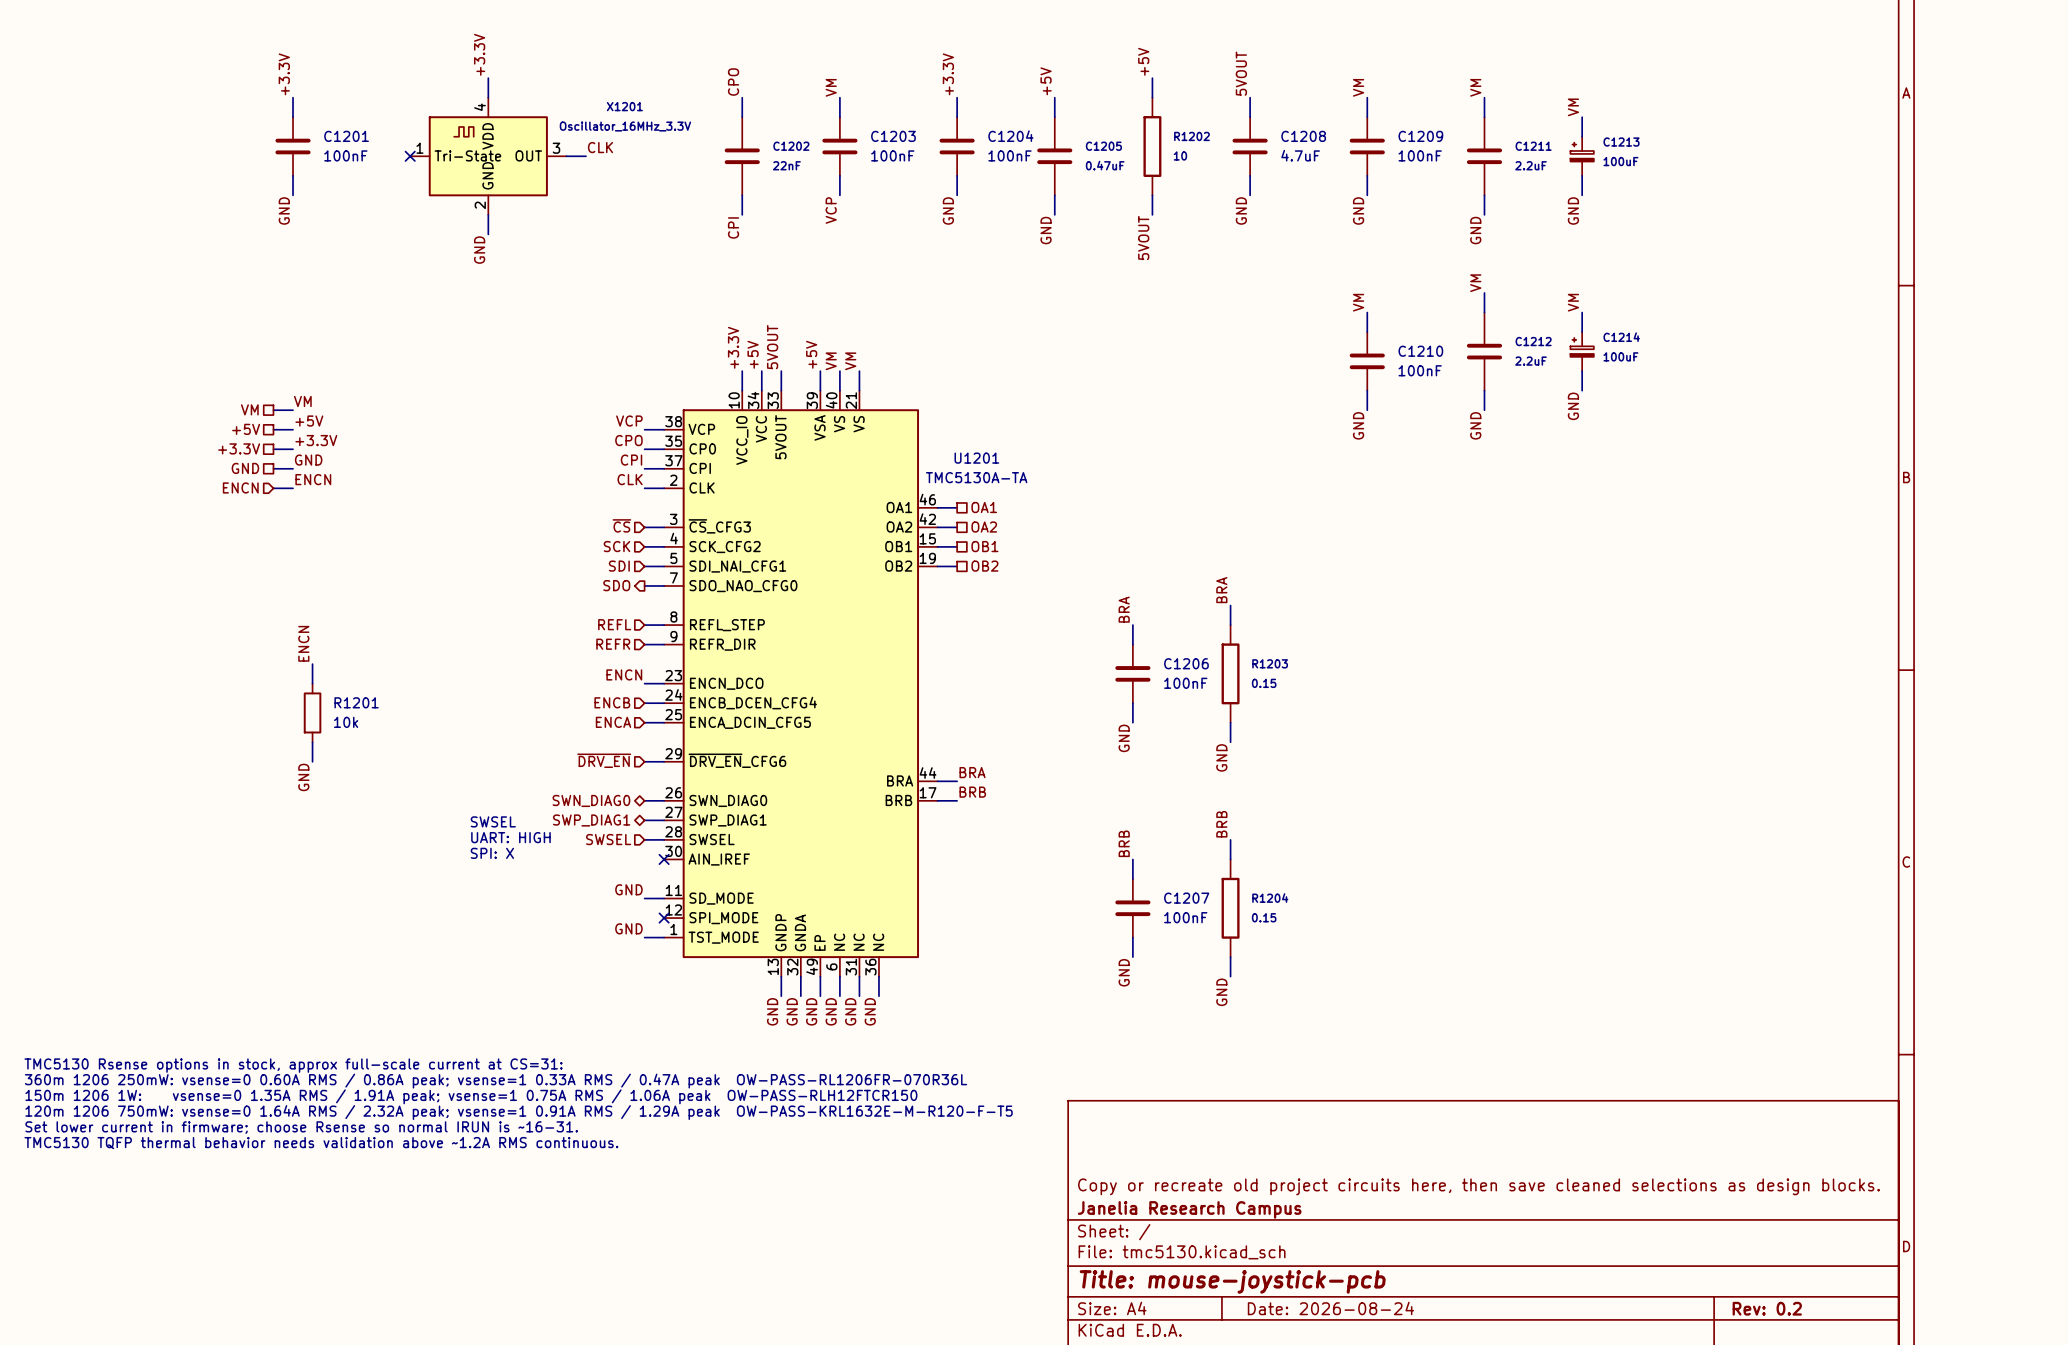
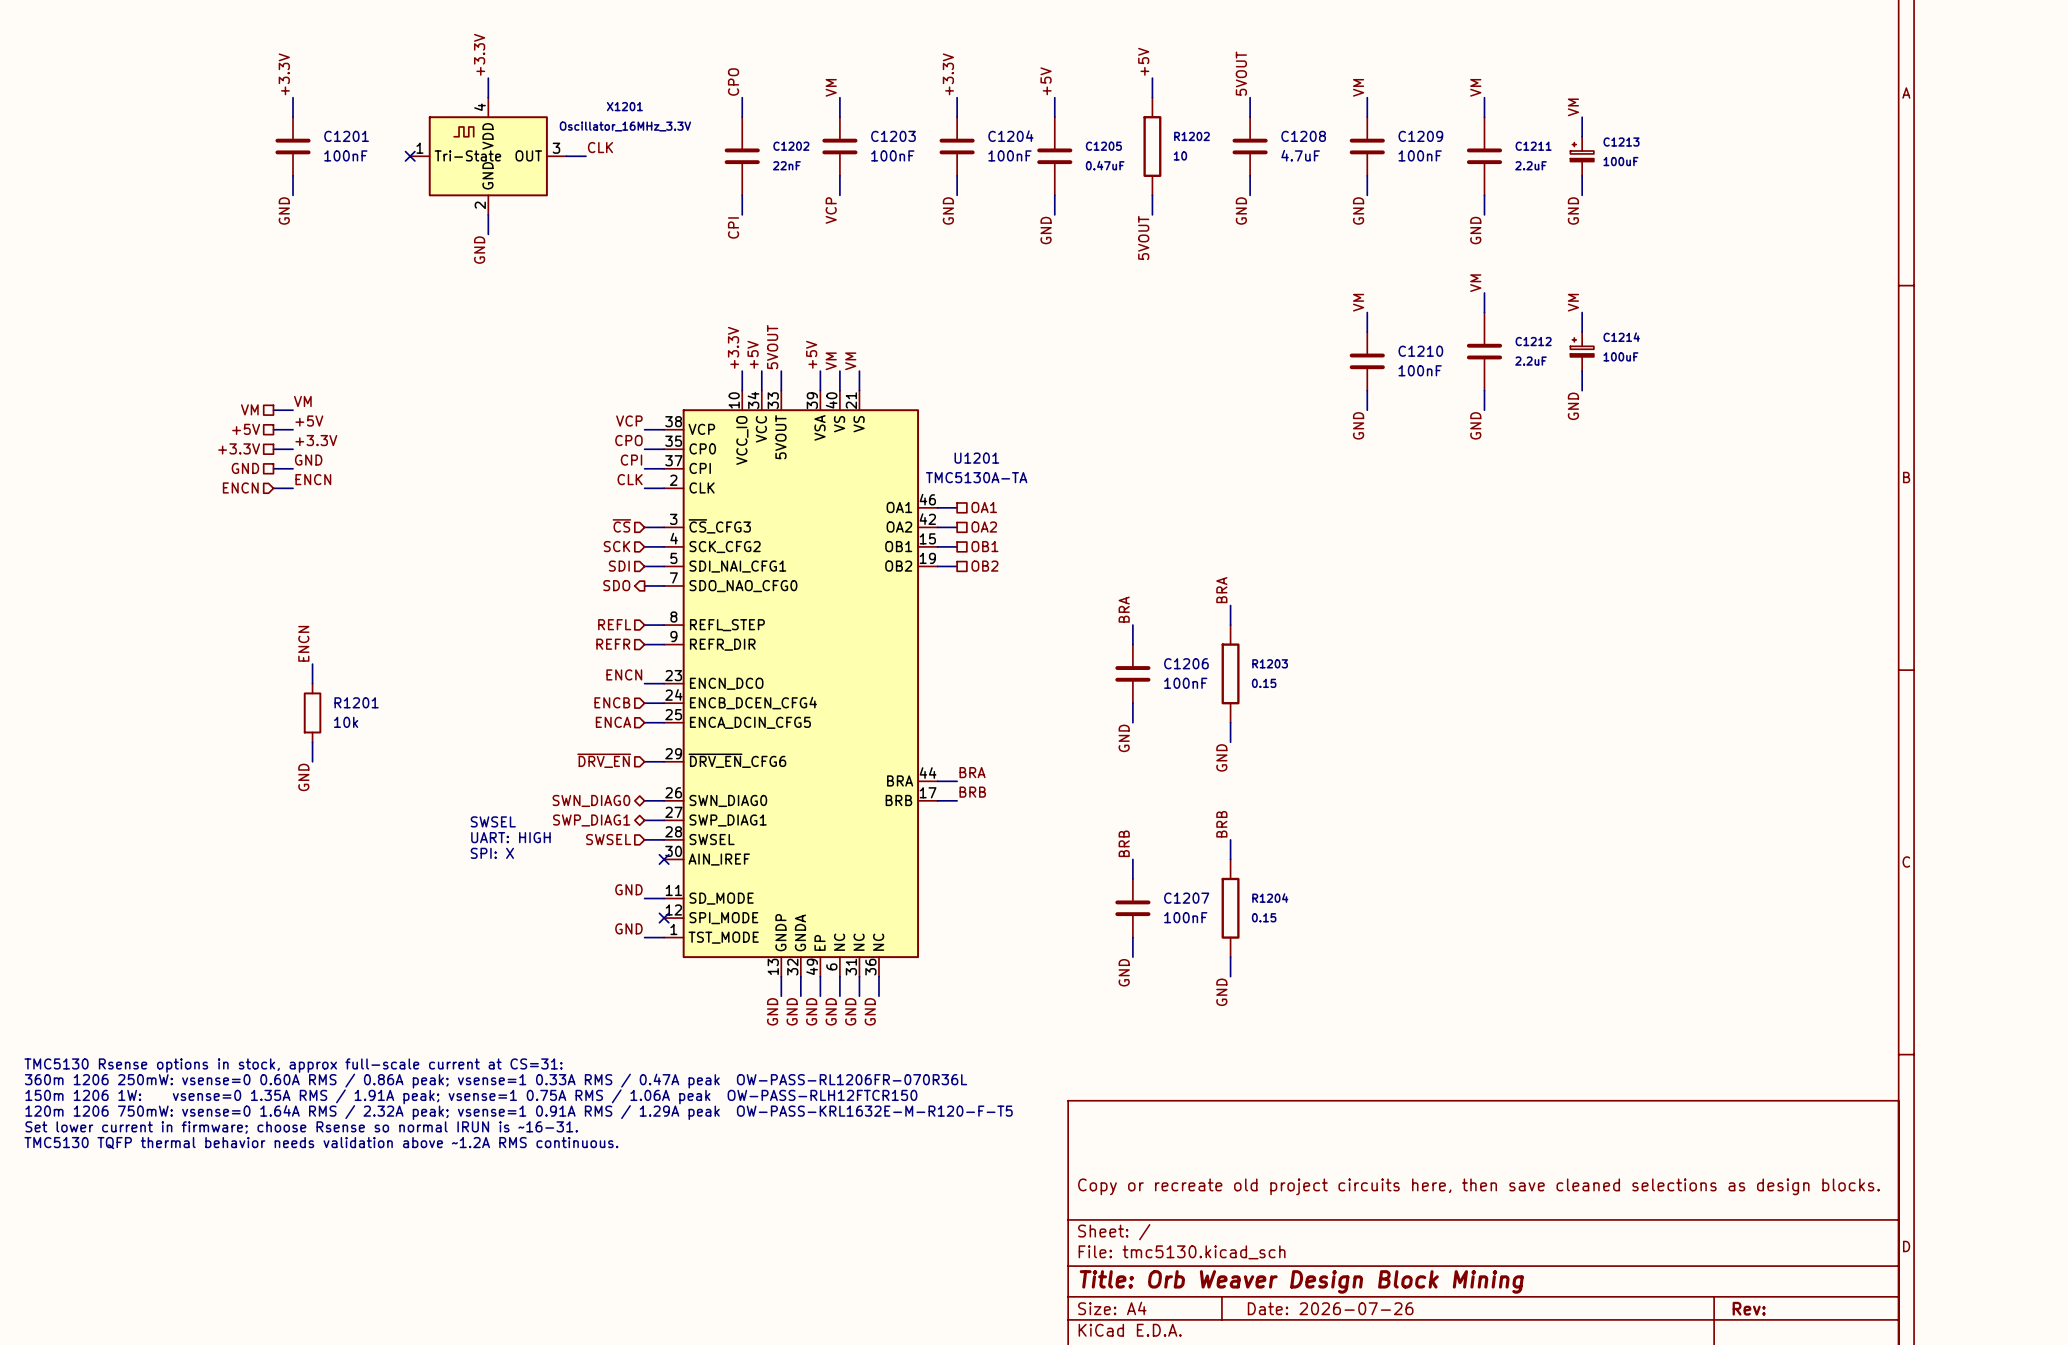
title block: Janelia Research Campus (1189, 1209) -> none
title block: Title: mouse-joystick-pcb (1232, 1281) -> Title: Orb Weaver Design Block Mining (1301, 1281)
title block: Date: 2026-08-24 (1330, 1308) -> Date: 2026-07-26 (1330, 1308)
title block: Rev: 0.2 (1767, 1308) -> Rev: (1749, 1308)

